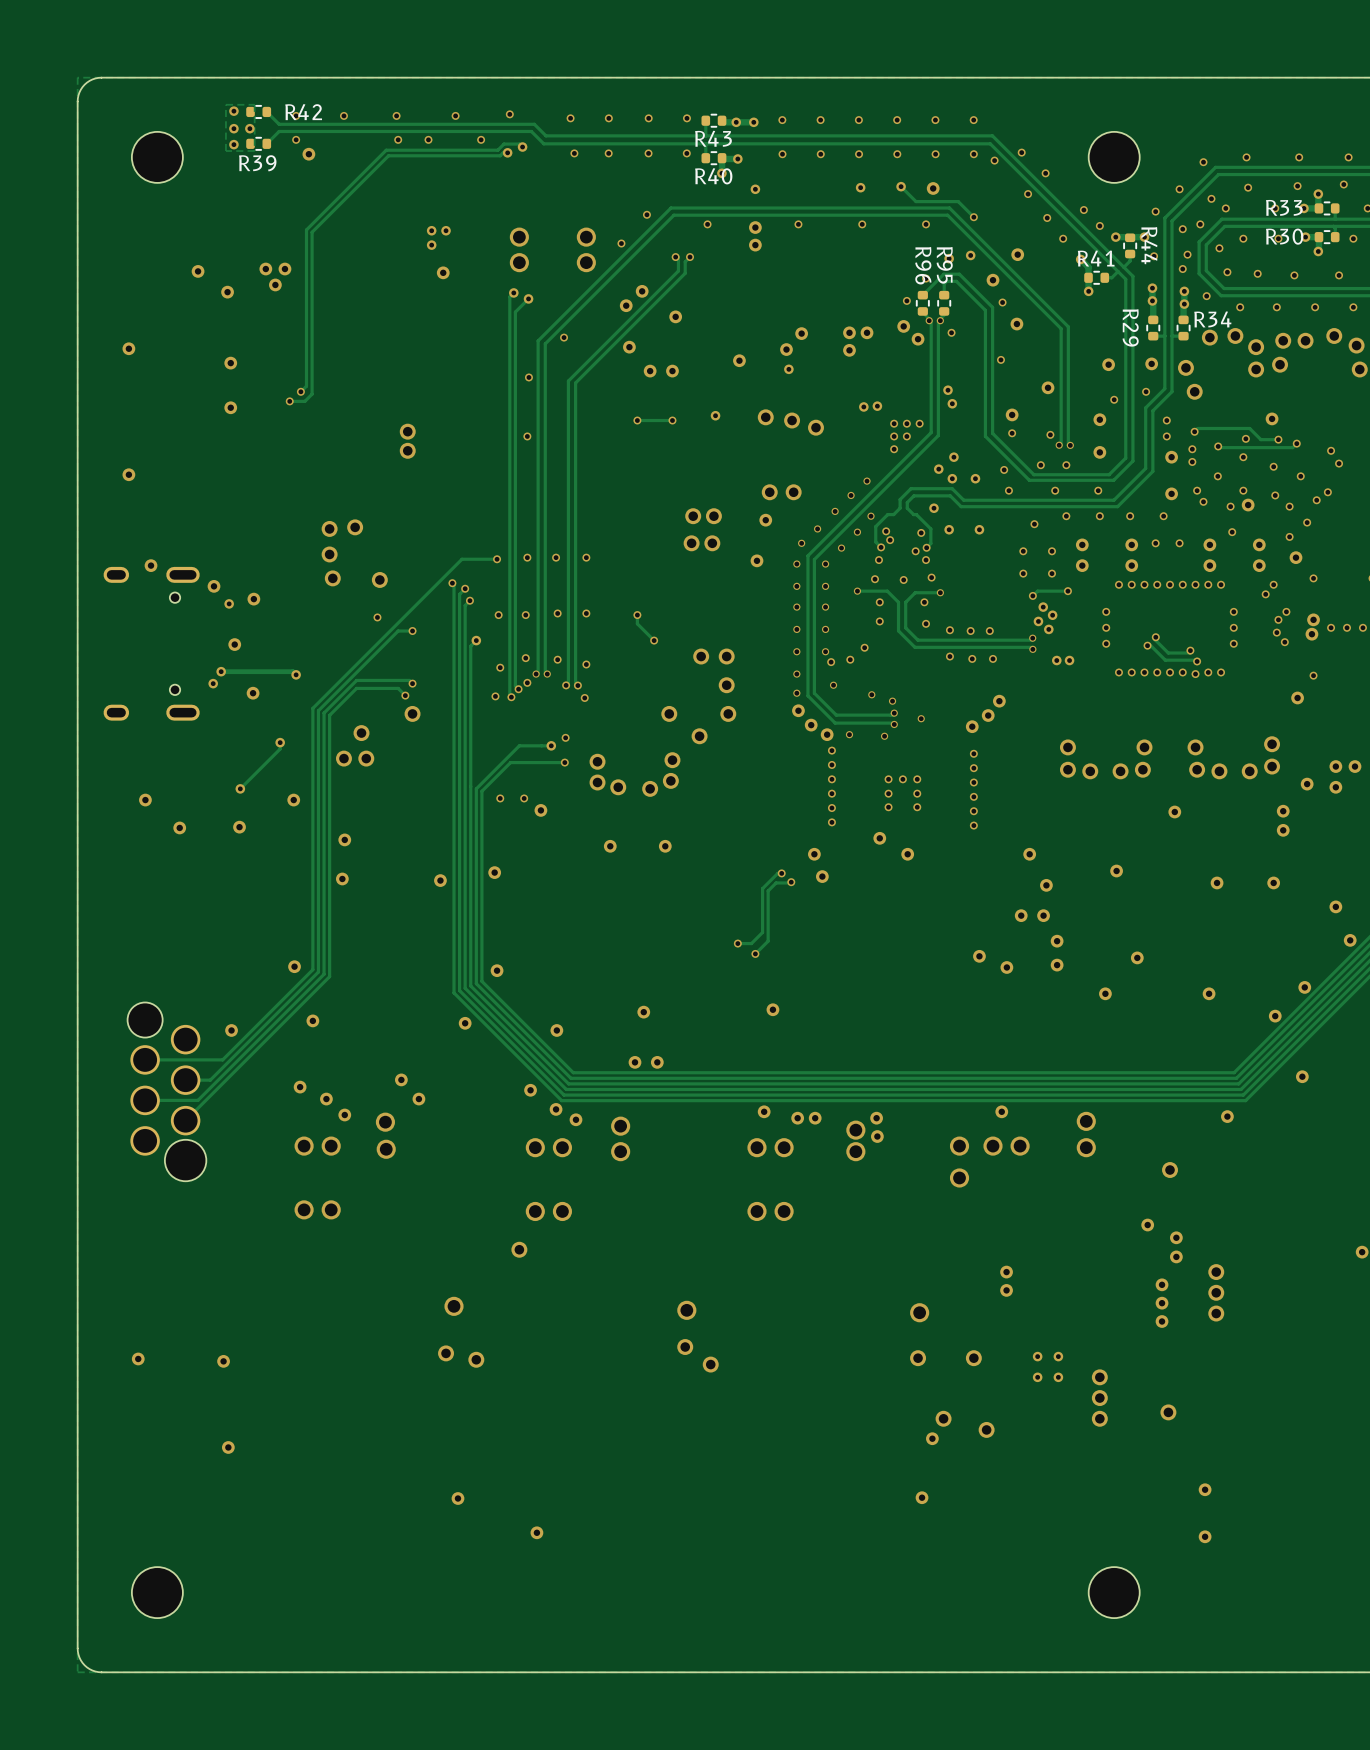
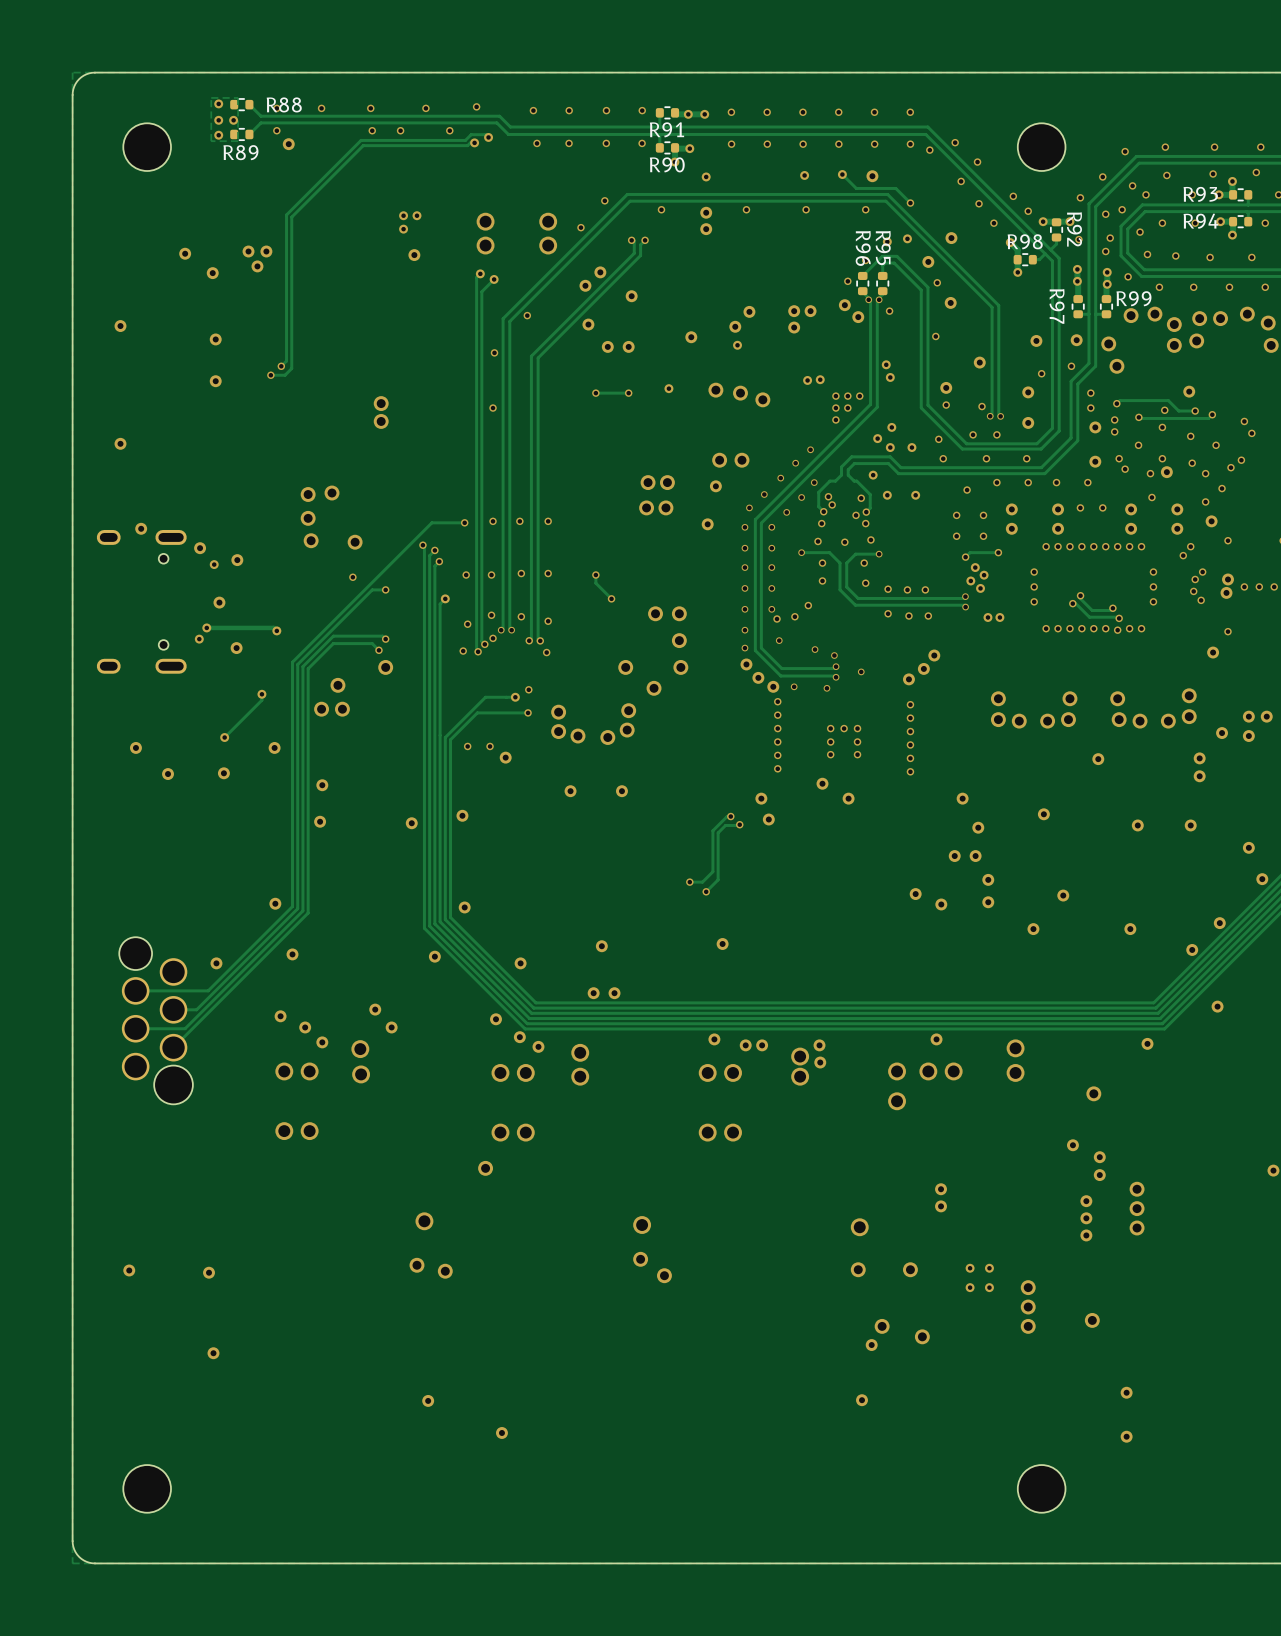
R42 name: R42 (303, 112) -> R88 (284, 104)
R43 name: R43 (713, 138) -> R91 (666, 129)
R39 name: R39 (257, 163) -> R89 (240, 152)
R40 name: R40 (713, 176) -> R90 (667, 164)
R33 name: R33 (1284, 207) -> R93 (1200, 194)
R30 name: R30 (1284, 236) -> R94 (1200, 221)
R44 name: R44 (1149, 245) -> R92 (1074, 229)
R41 name: R41 (1096, 258) -> R98 (1025, 241)
R34 name: R34 (1212, 319) -> R99 (1133, 298)
R29 name: R29 (1130, 327) -> R97 (1057, 306)

